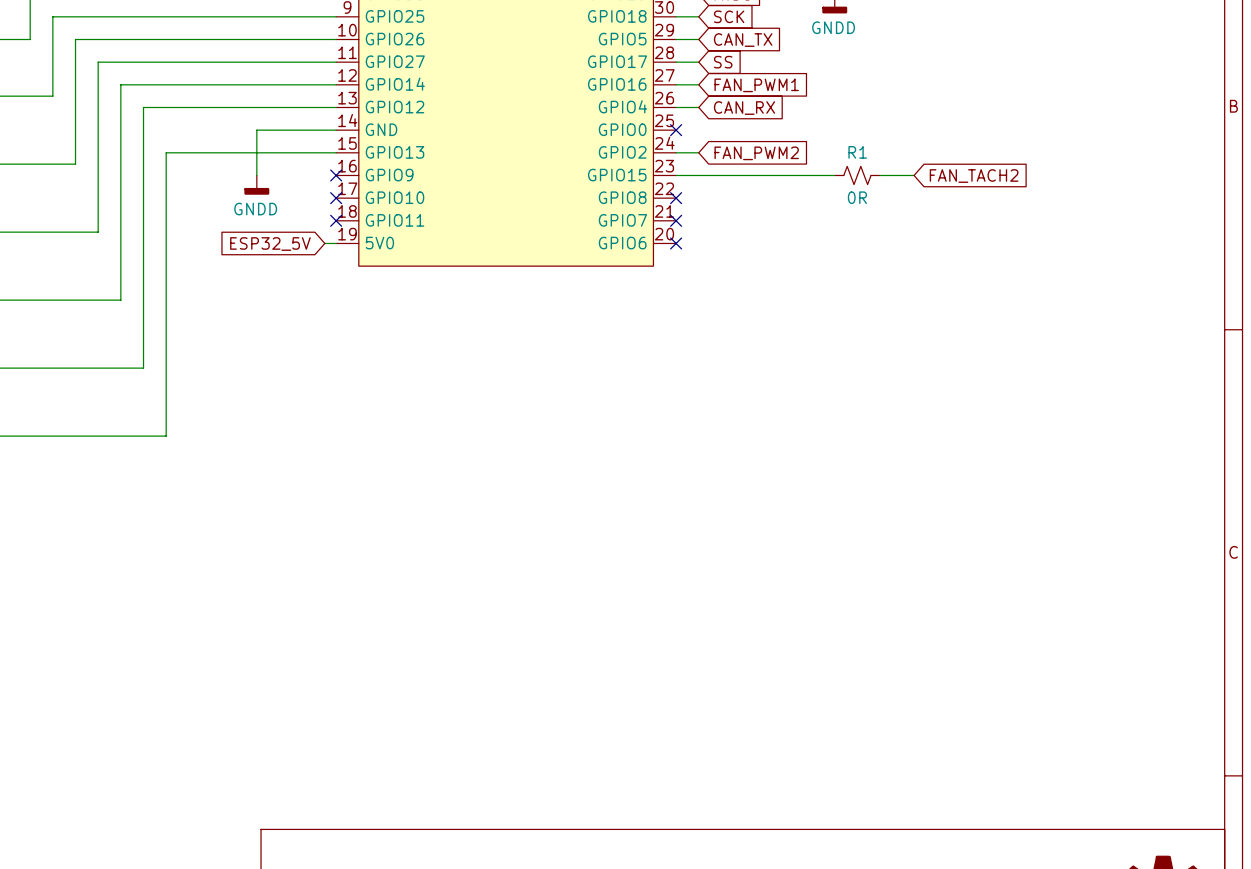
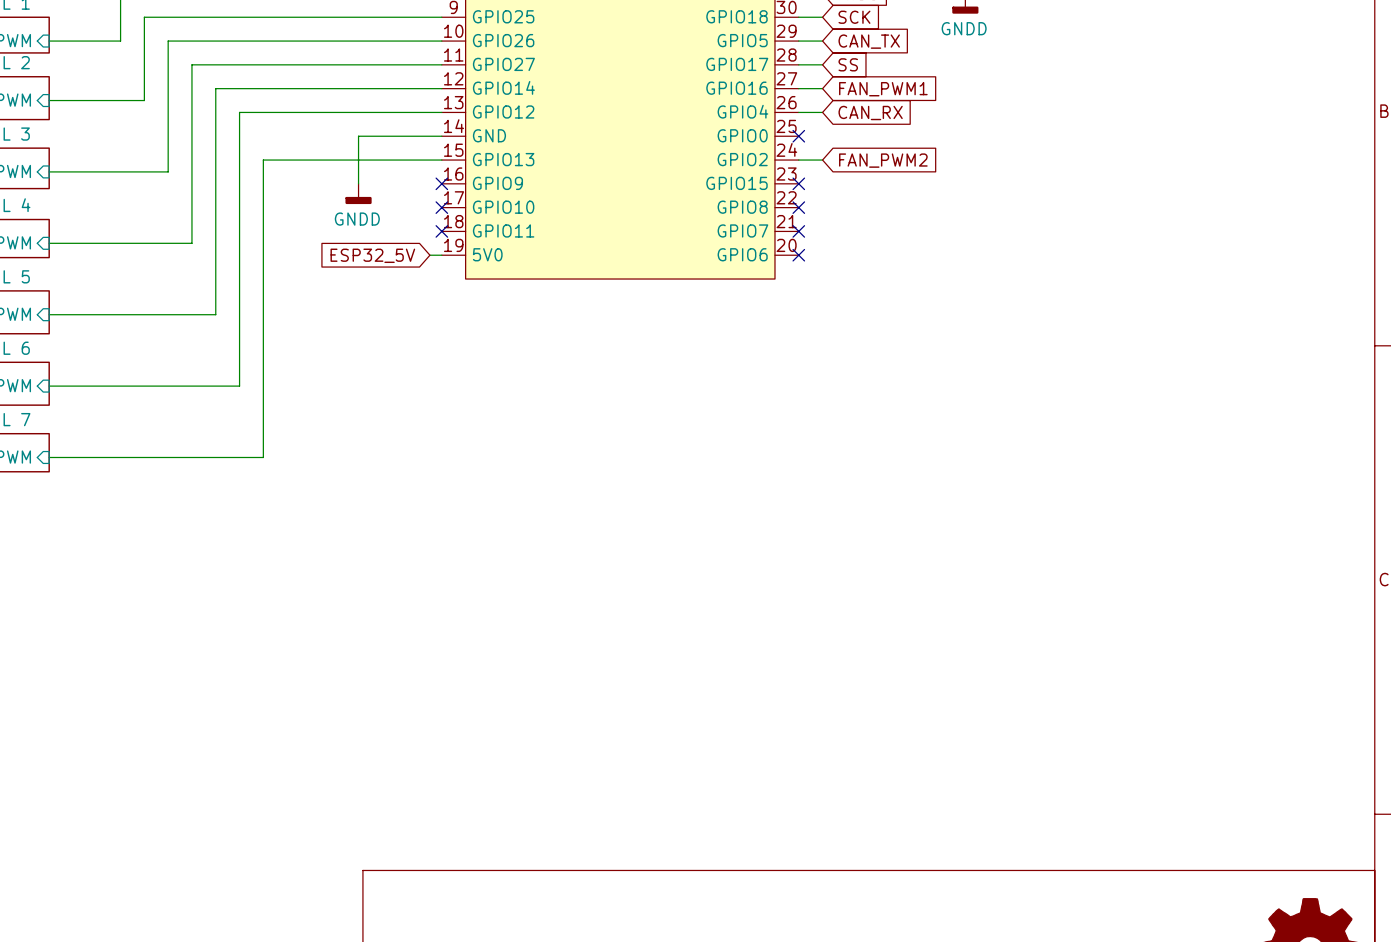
wire: (676, 175) (834, 175) -> none
no-connect mark: none -> (798, 183)
R1: 0R (857, 175) -> none
wire: (880, 175) (914, 175) -> none
global label: FAN_TACH2 (974, 176) -> none

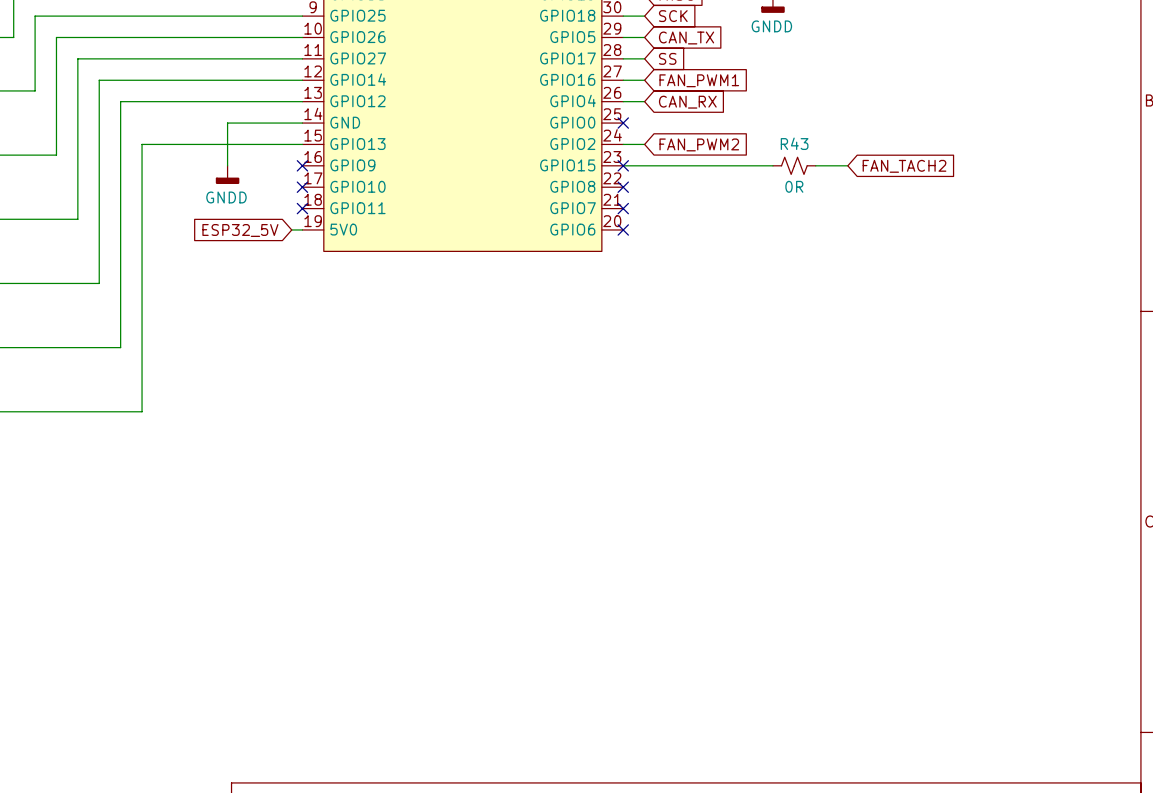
wire: none -> (623, 165) (772, 165)
R43: none -> 0R (794, 165)
wire: none -> (815, 165) (847, 165)
global label: none -> FAN_TACH2 (904, 166)

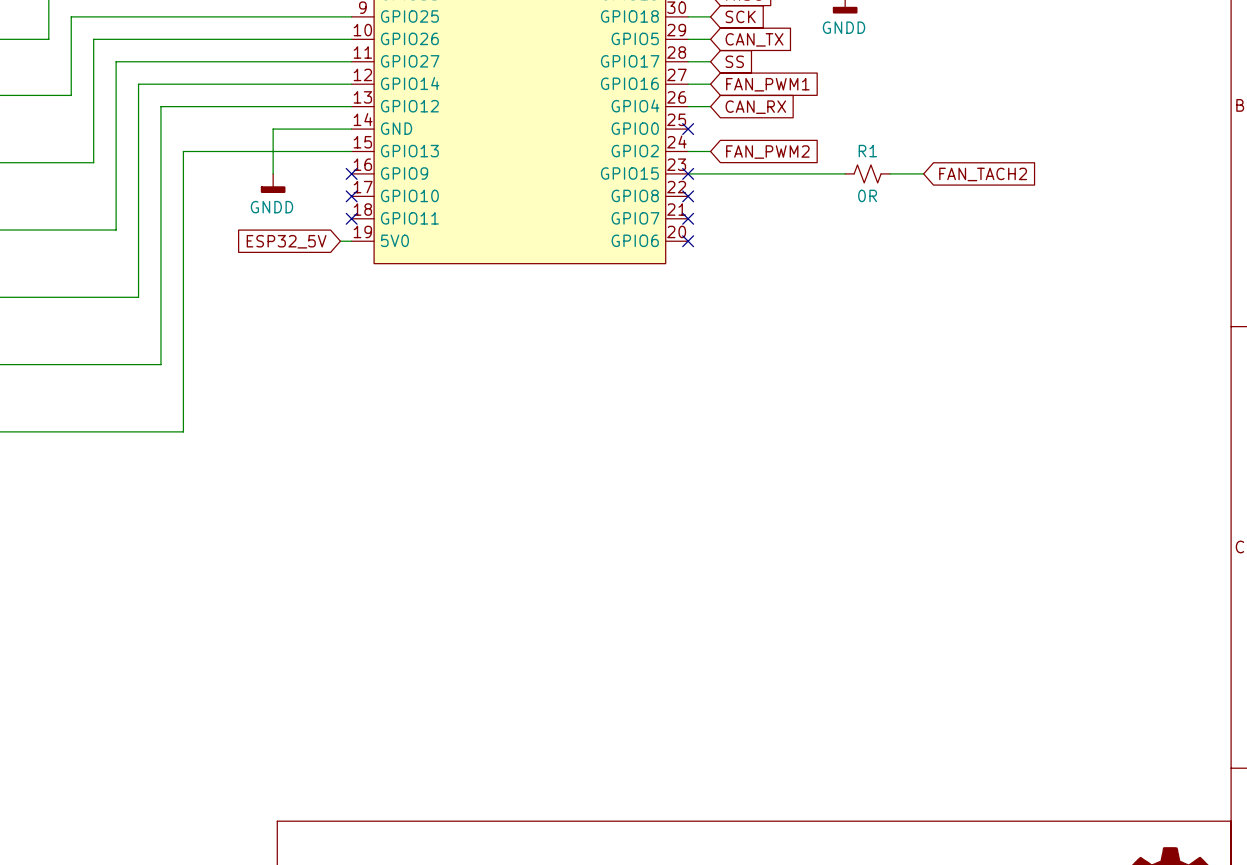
R43 name: R43 (794, 143) -> R1 (867, 151)

